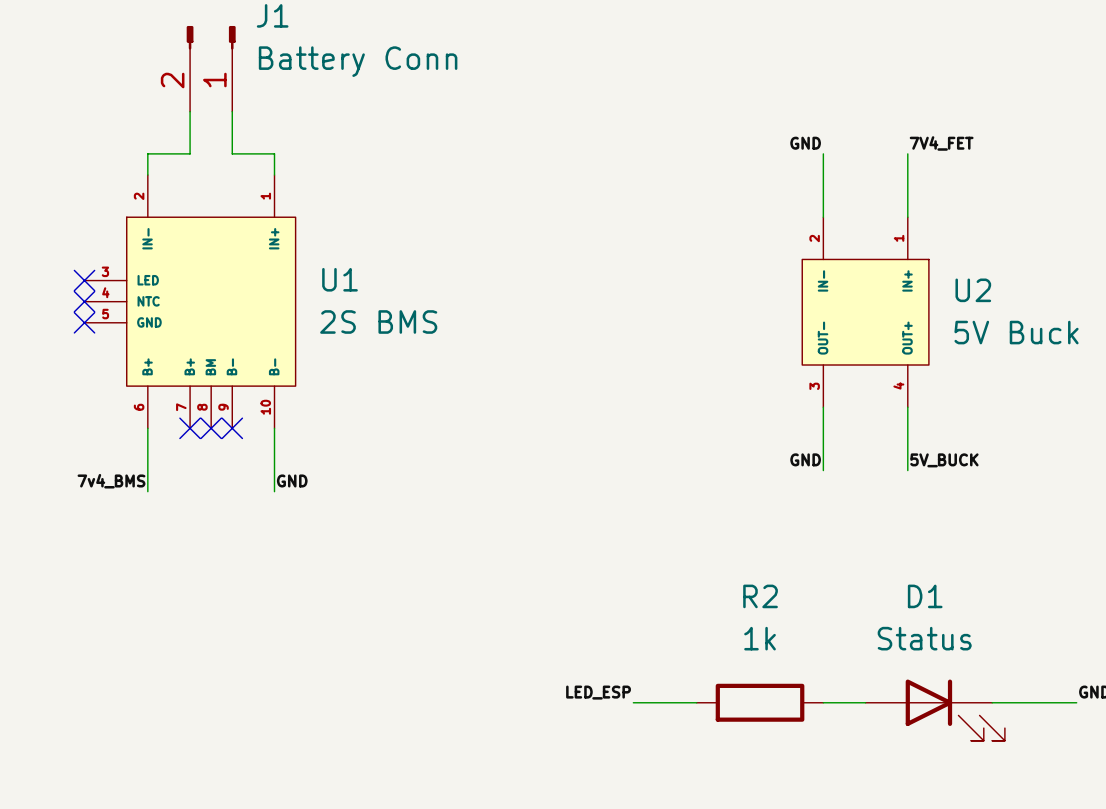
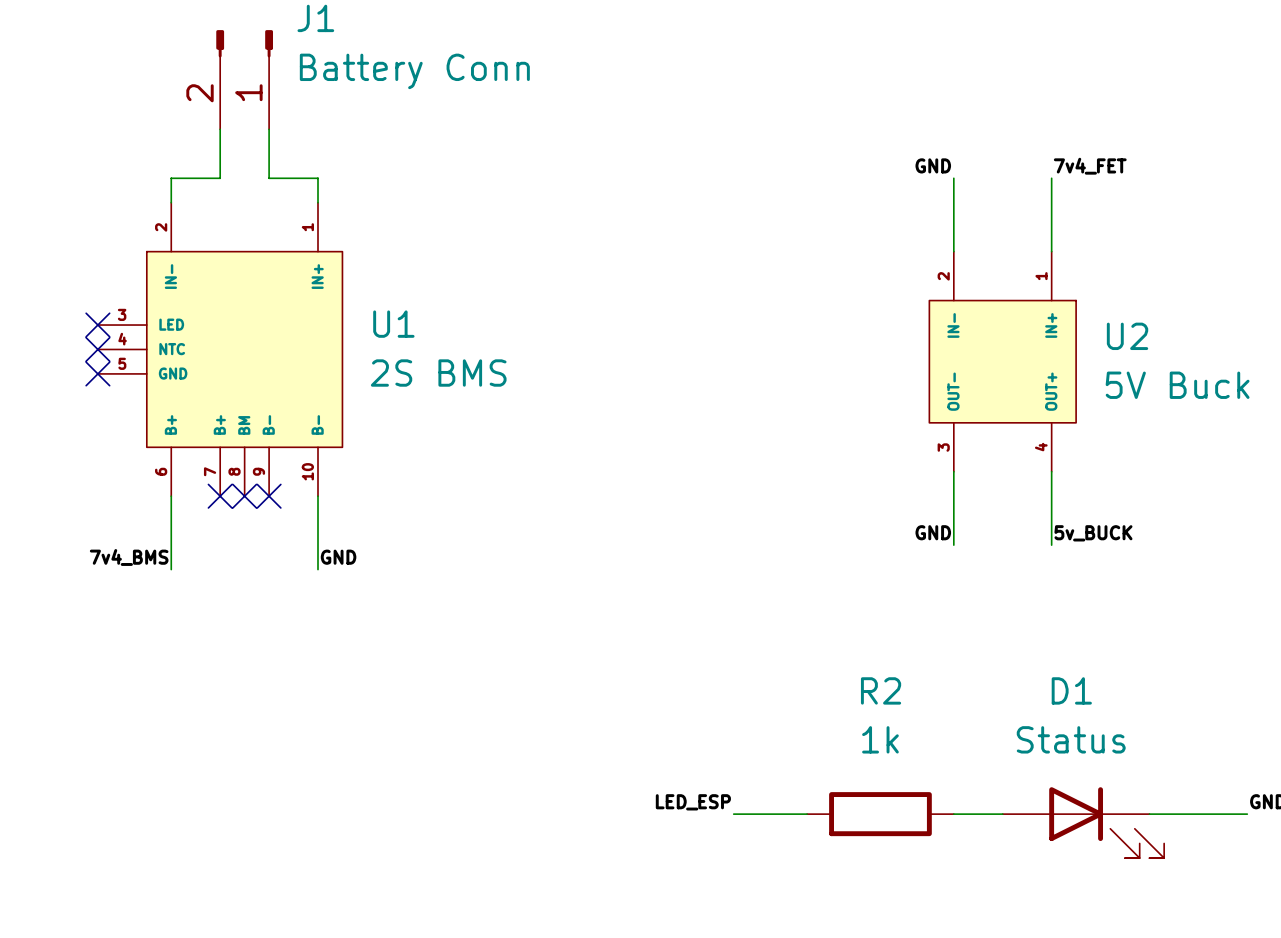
label: 7V4_FET (941, 143) -> 7v4_FET (1090, 166)
label: 5V_BUCK (944, 460) -> 5v_BUCK (1093, 533)

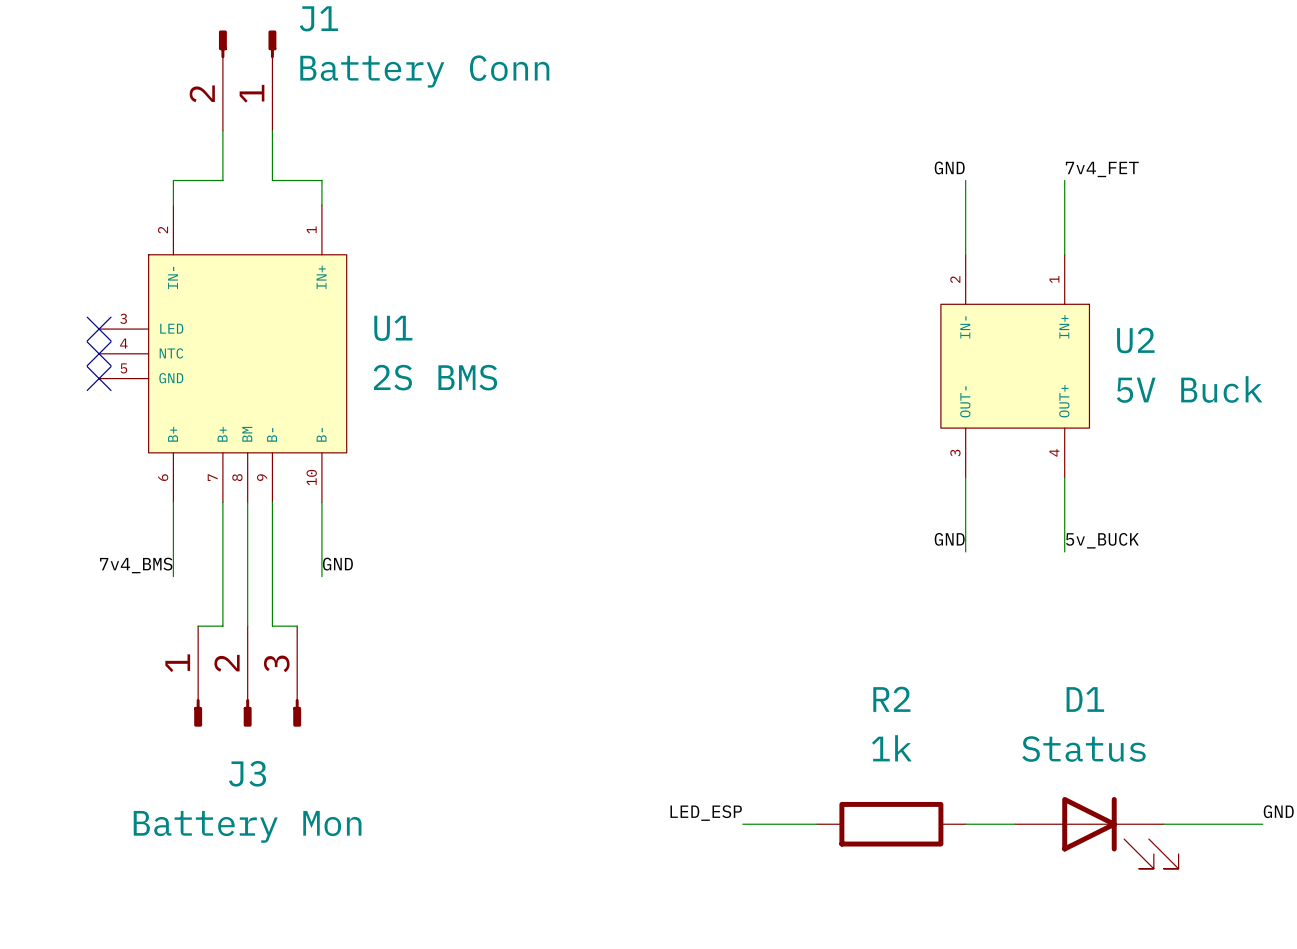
wire: none -> (222, 502) (222, 626) (198, 626)
no-connect mark: (220, 496) -> none
wire: none -> (247, 502) (247, 626)
no-connect mark: (244, 496) -> none
wire: none -> (272, 502) (272, 626) (297, 626)
no-connect mark: (269, 496) -> none
J3: none -> Battery Mon (247, 676)

